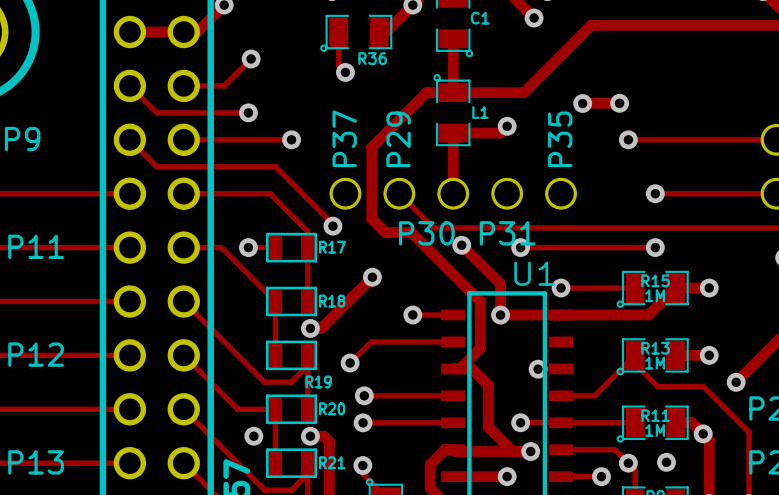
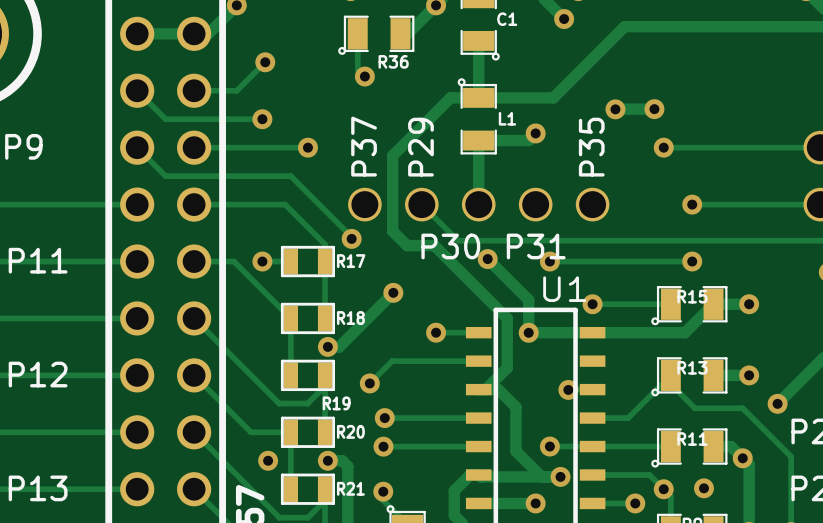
R15 value: 1M (655, 295) -> none
R13 value: 1M (655, 363) -> none
R11 value: 1M (655, 430) -> none

